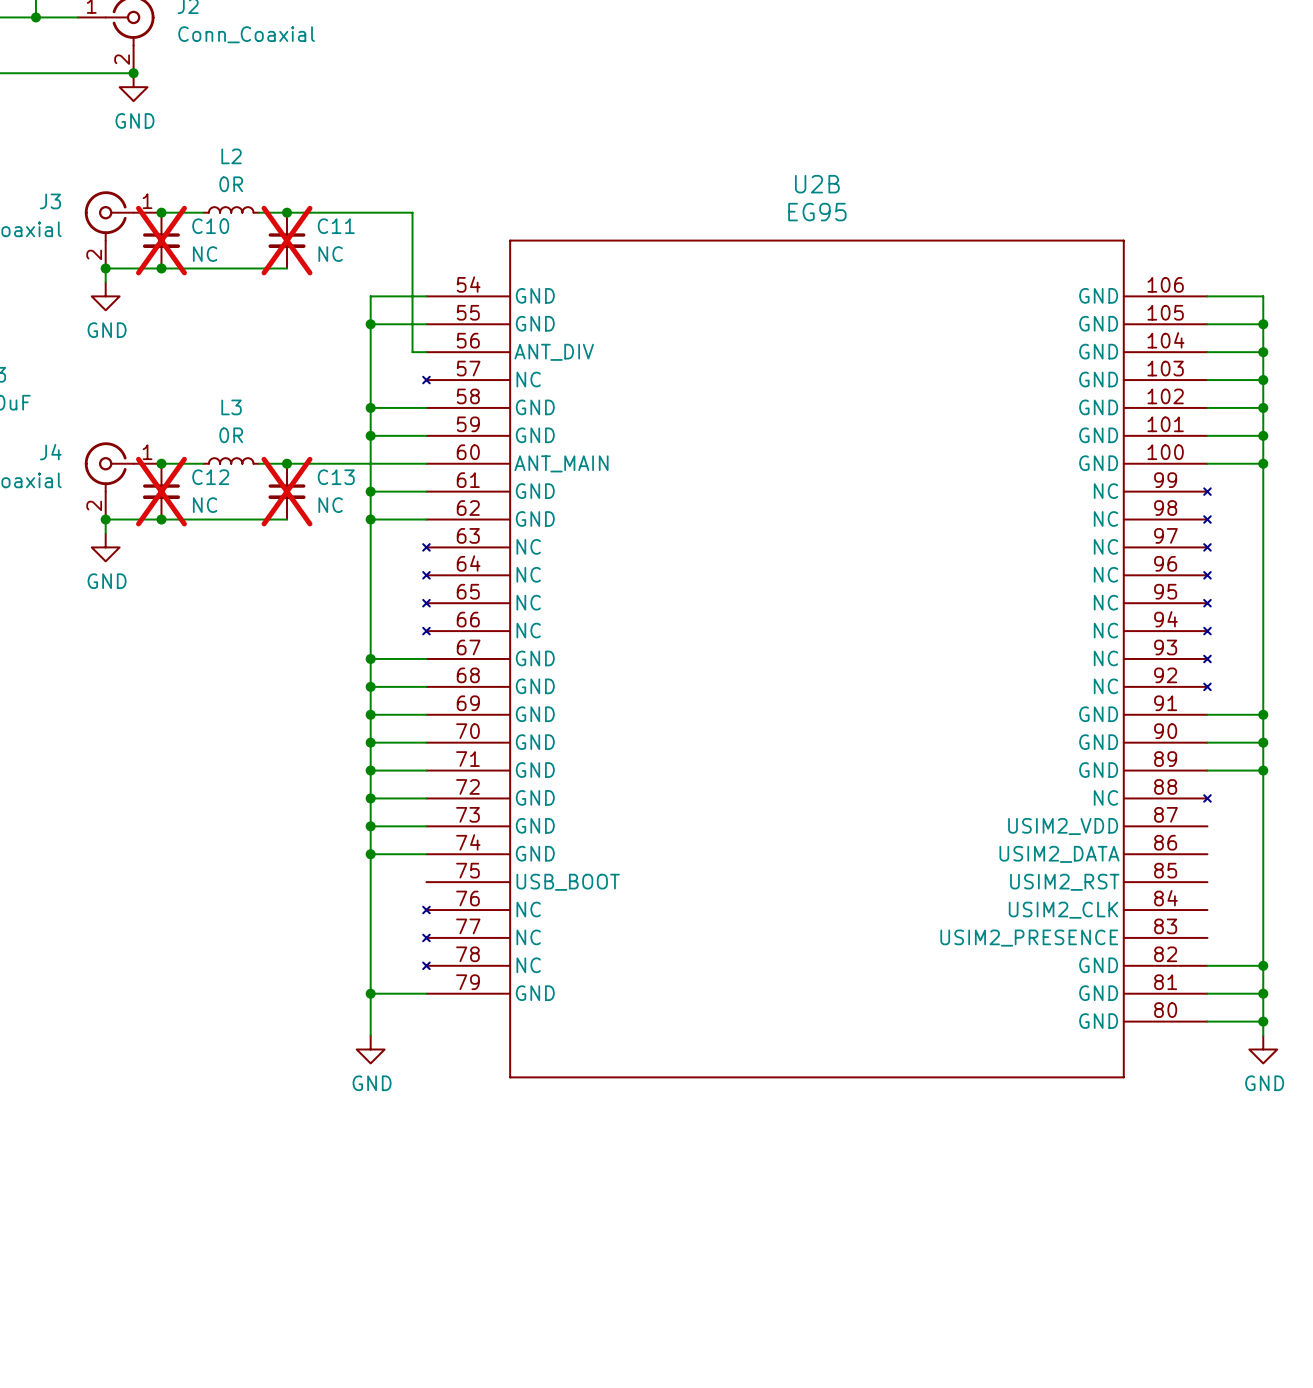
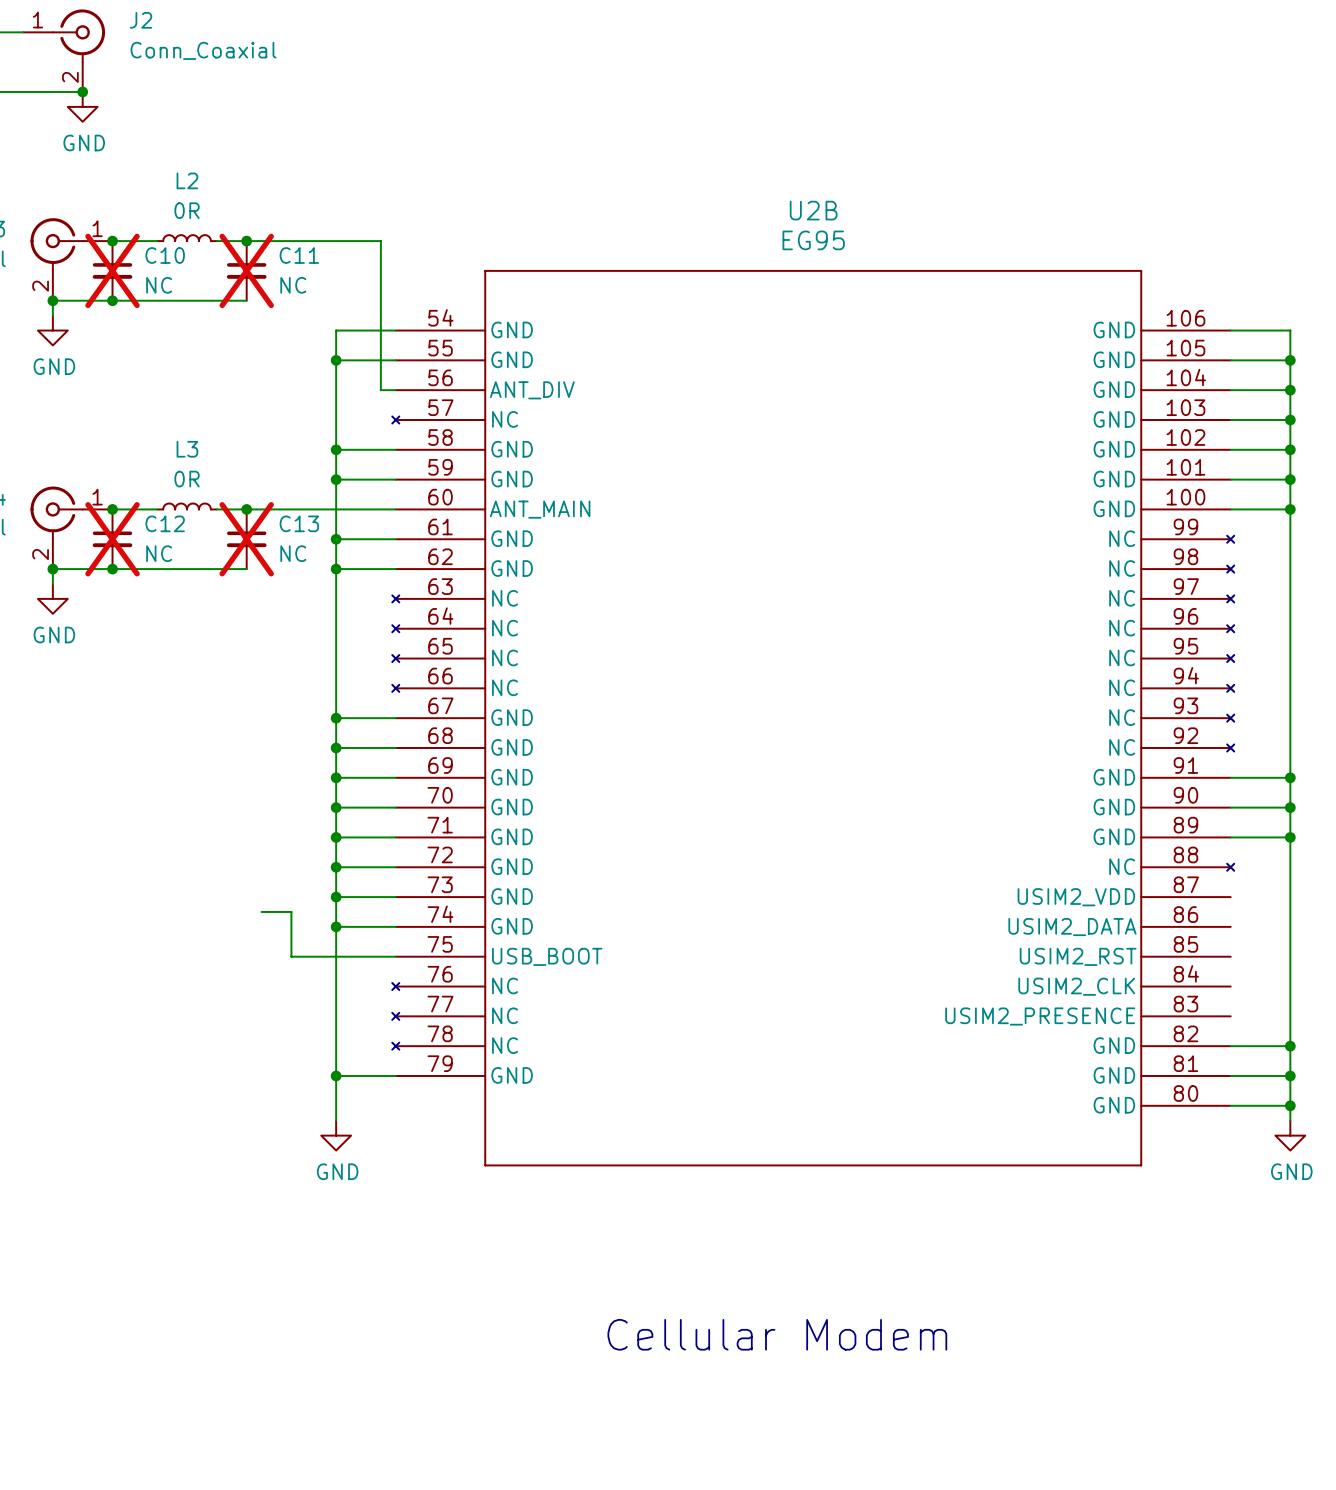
wire: none -> (261, 911) (291, 911) (291, 956) (395, 956)
text: none -> Cellular Modem (777, 1334)

